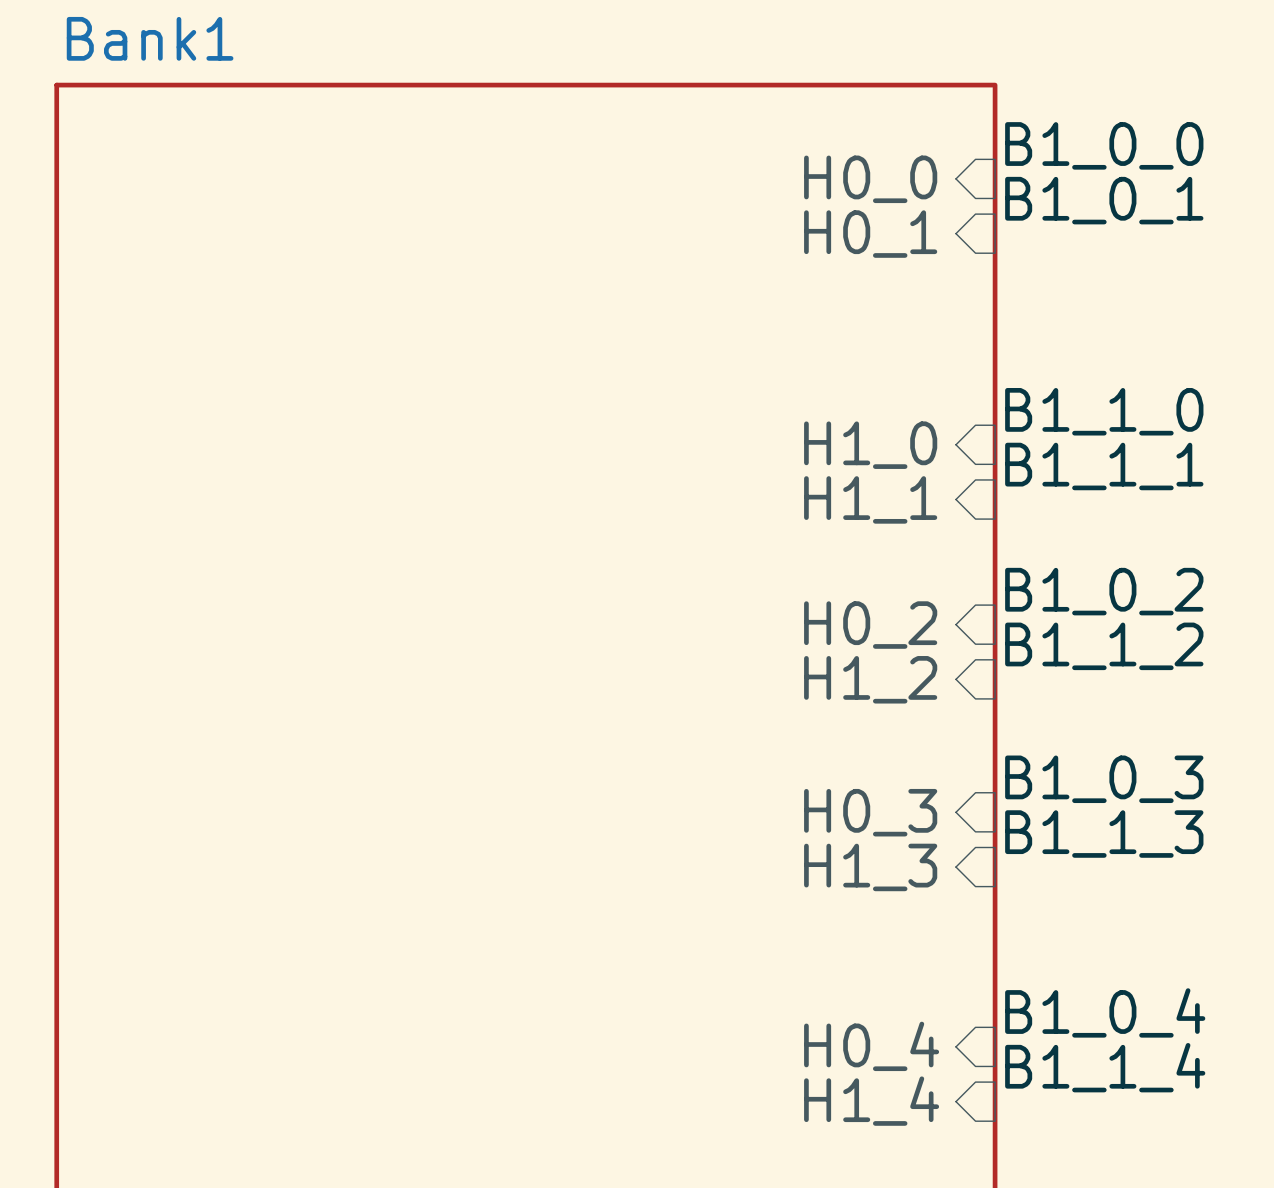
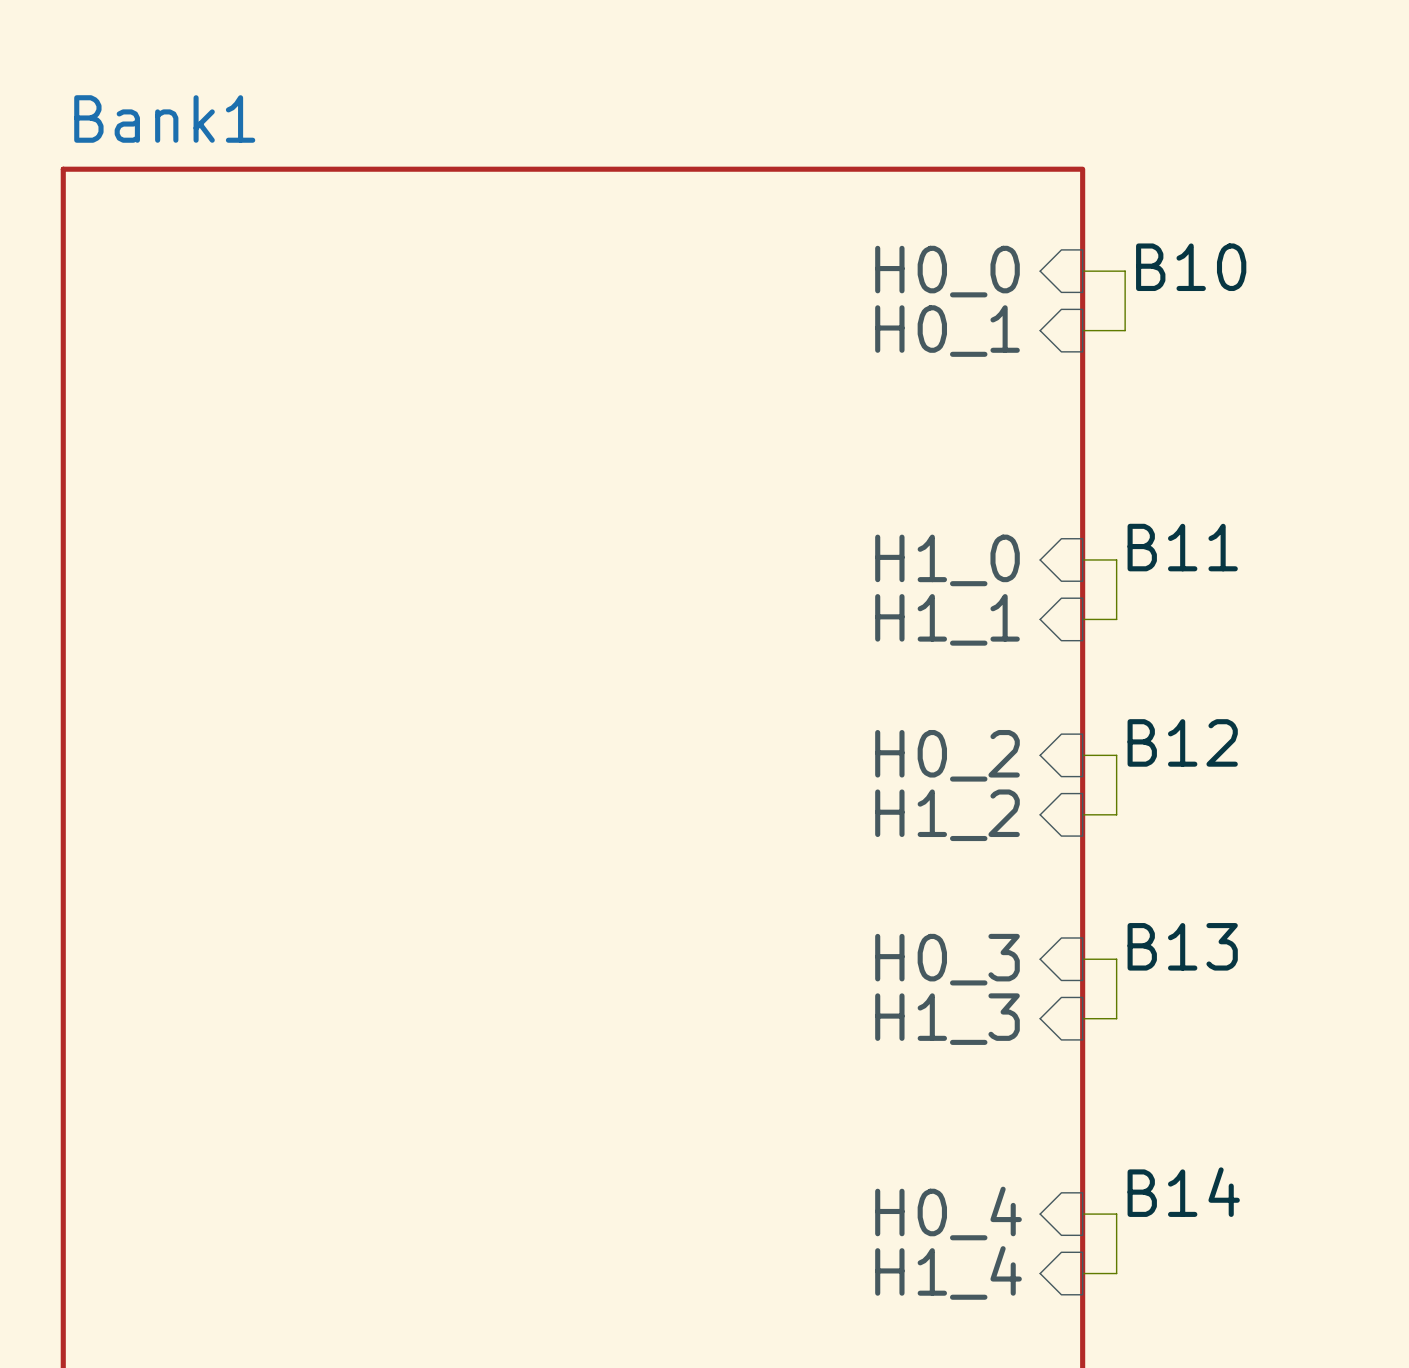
label: B1_0_0 (1104, 145) -> none
label: none -> B10 (1191, 267)
wire: none -> (1082, 271) (1125, 271) (1125, 330) (1082, 330)
label: B1_0_1 (1104, 200) -> none
label: B1_1_0 (1104, 411) -> none
label: none -> B11 (1182, 547)
wire: none -> (1082, 559) (1116, 559) (1116, 619) (1082, 619)
label: B1_1_1 (1104, 466) -> none
label: B1_0_2 (1104, 591) -> none
label: none -> B12 (1182, 742)
wire: none -> (1082, 755) (1116, 755) (1116, 814) (1082, 814)
label: B1_1_2 (1104, 646) -> none
label: B1_0_3 (1104, 779) -> none
label: none -> B13 (1182, 946)
wire: none -> (1082, 959) (1116, 959) (1116, 1018) (1082, 1018)
label: B1_1_3 (1104, 834) -> none
label: B1_0_4 (1105, 1012) -> none
label: none -> B14 (1183, 1192)
wire: none -> (1082, 1214) (1116, 1214) (1116, 1273) (1082, 1273)
label: B1_1_4 (1105, 1067) -> none

